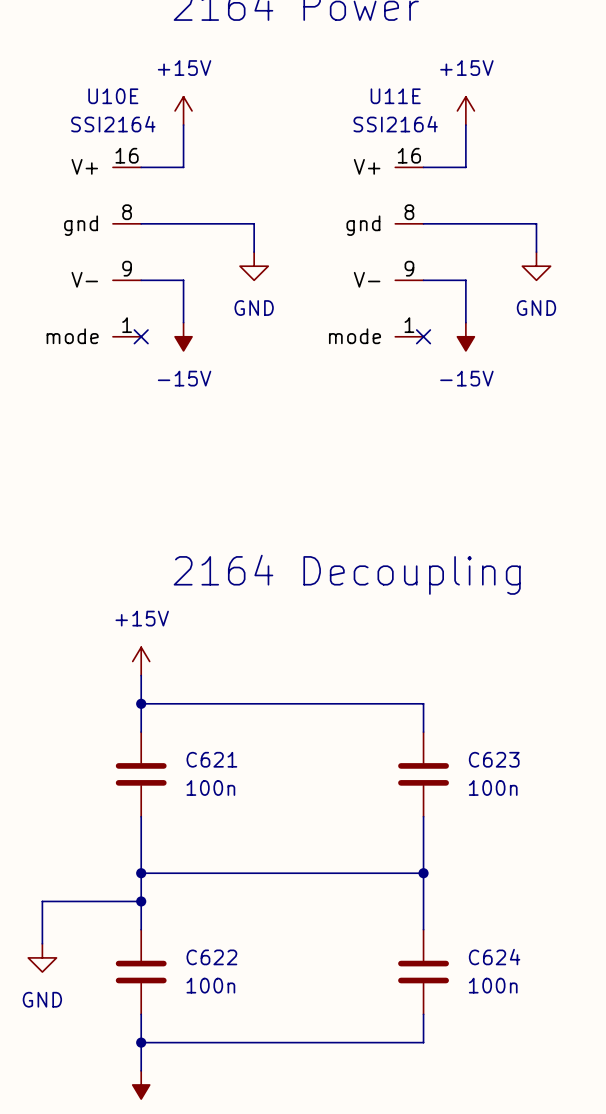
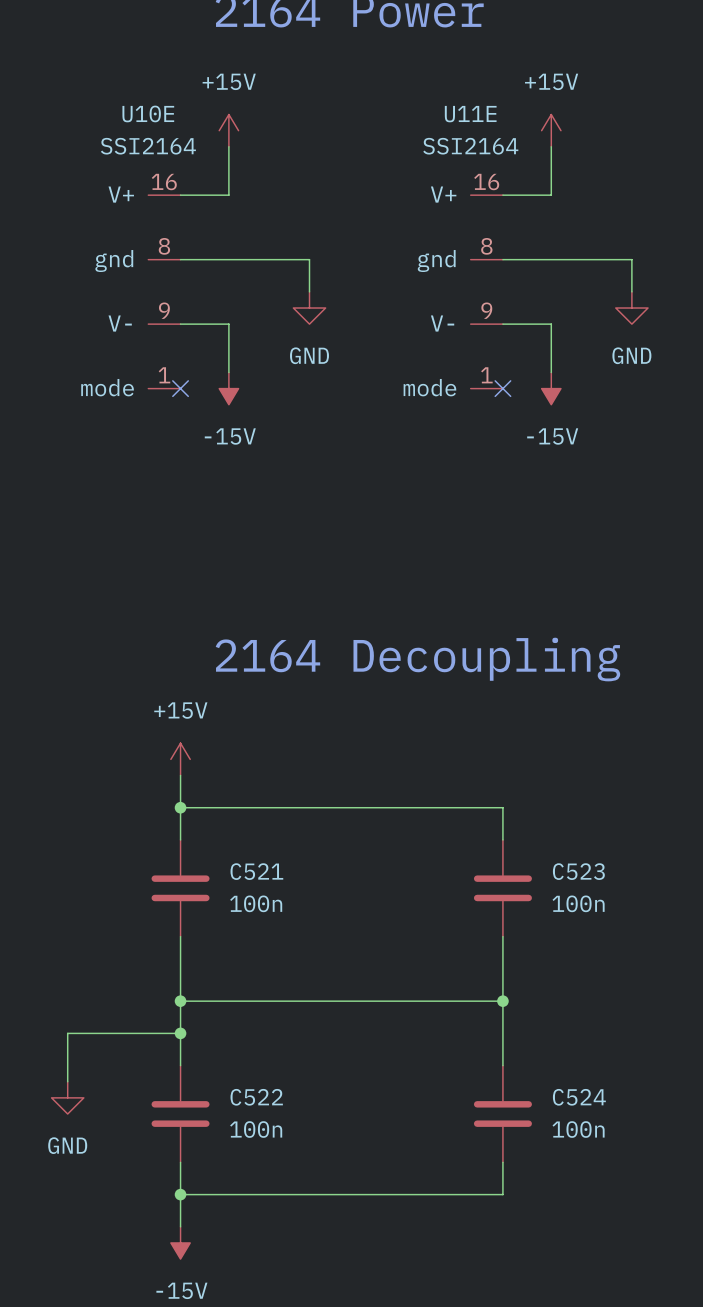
C621 name: C621 (211, 759) -> C521 (256, 871)
C623 name: C623 (494, 759) -> C523 (578, 871)
C622 name: C622 (211, 957) -> C522 (256, 1097)
C624 name: C624 (494, 957) -> C524 (579, 1097)

